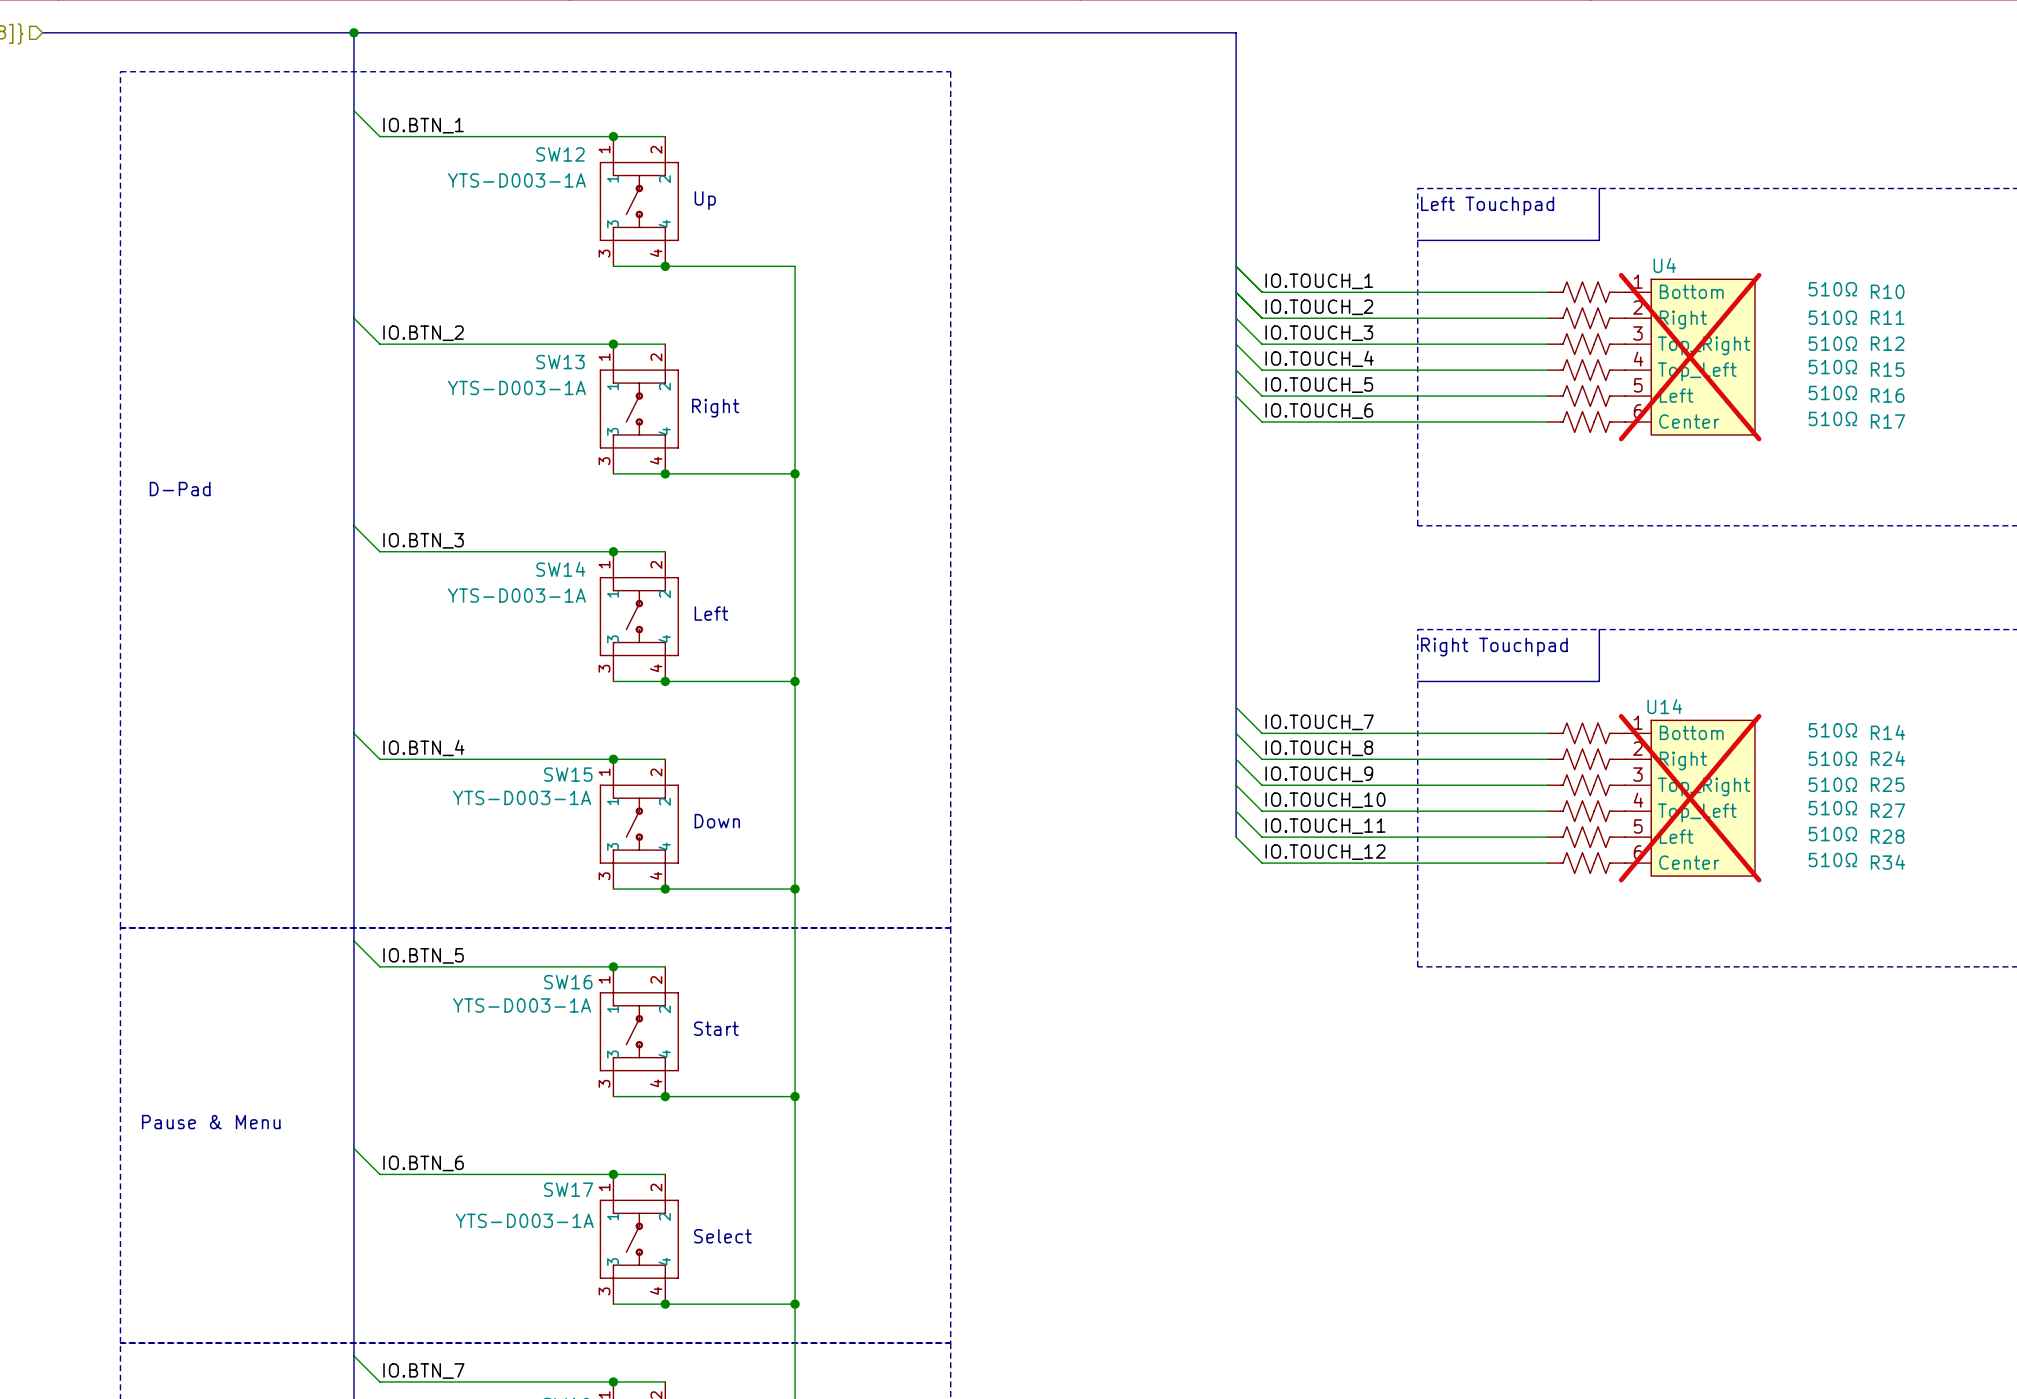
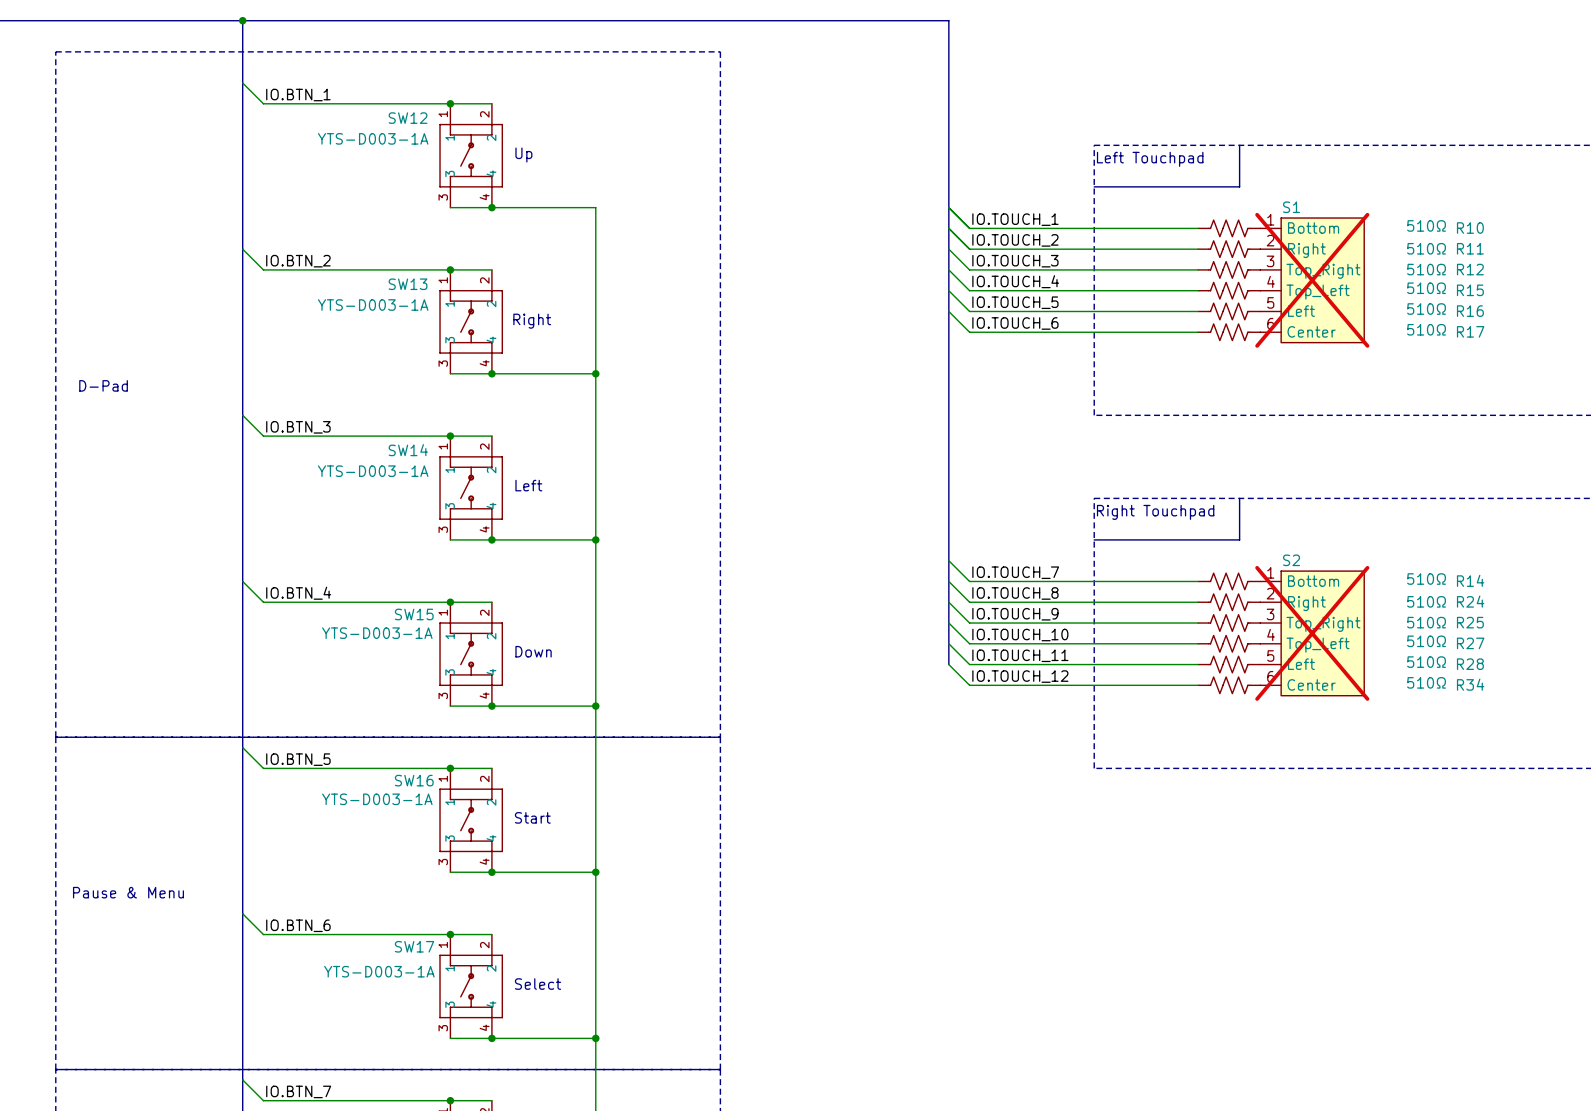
U4 name: U4 (1664, 265) -> S1 (1291, 207)
U14 name: U14 (1664, 706) -> S2 (1291, 560)

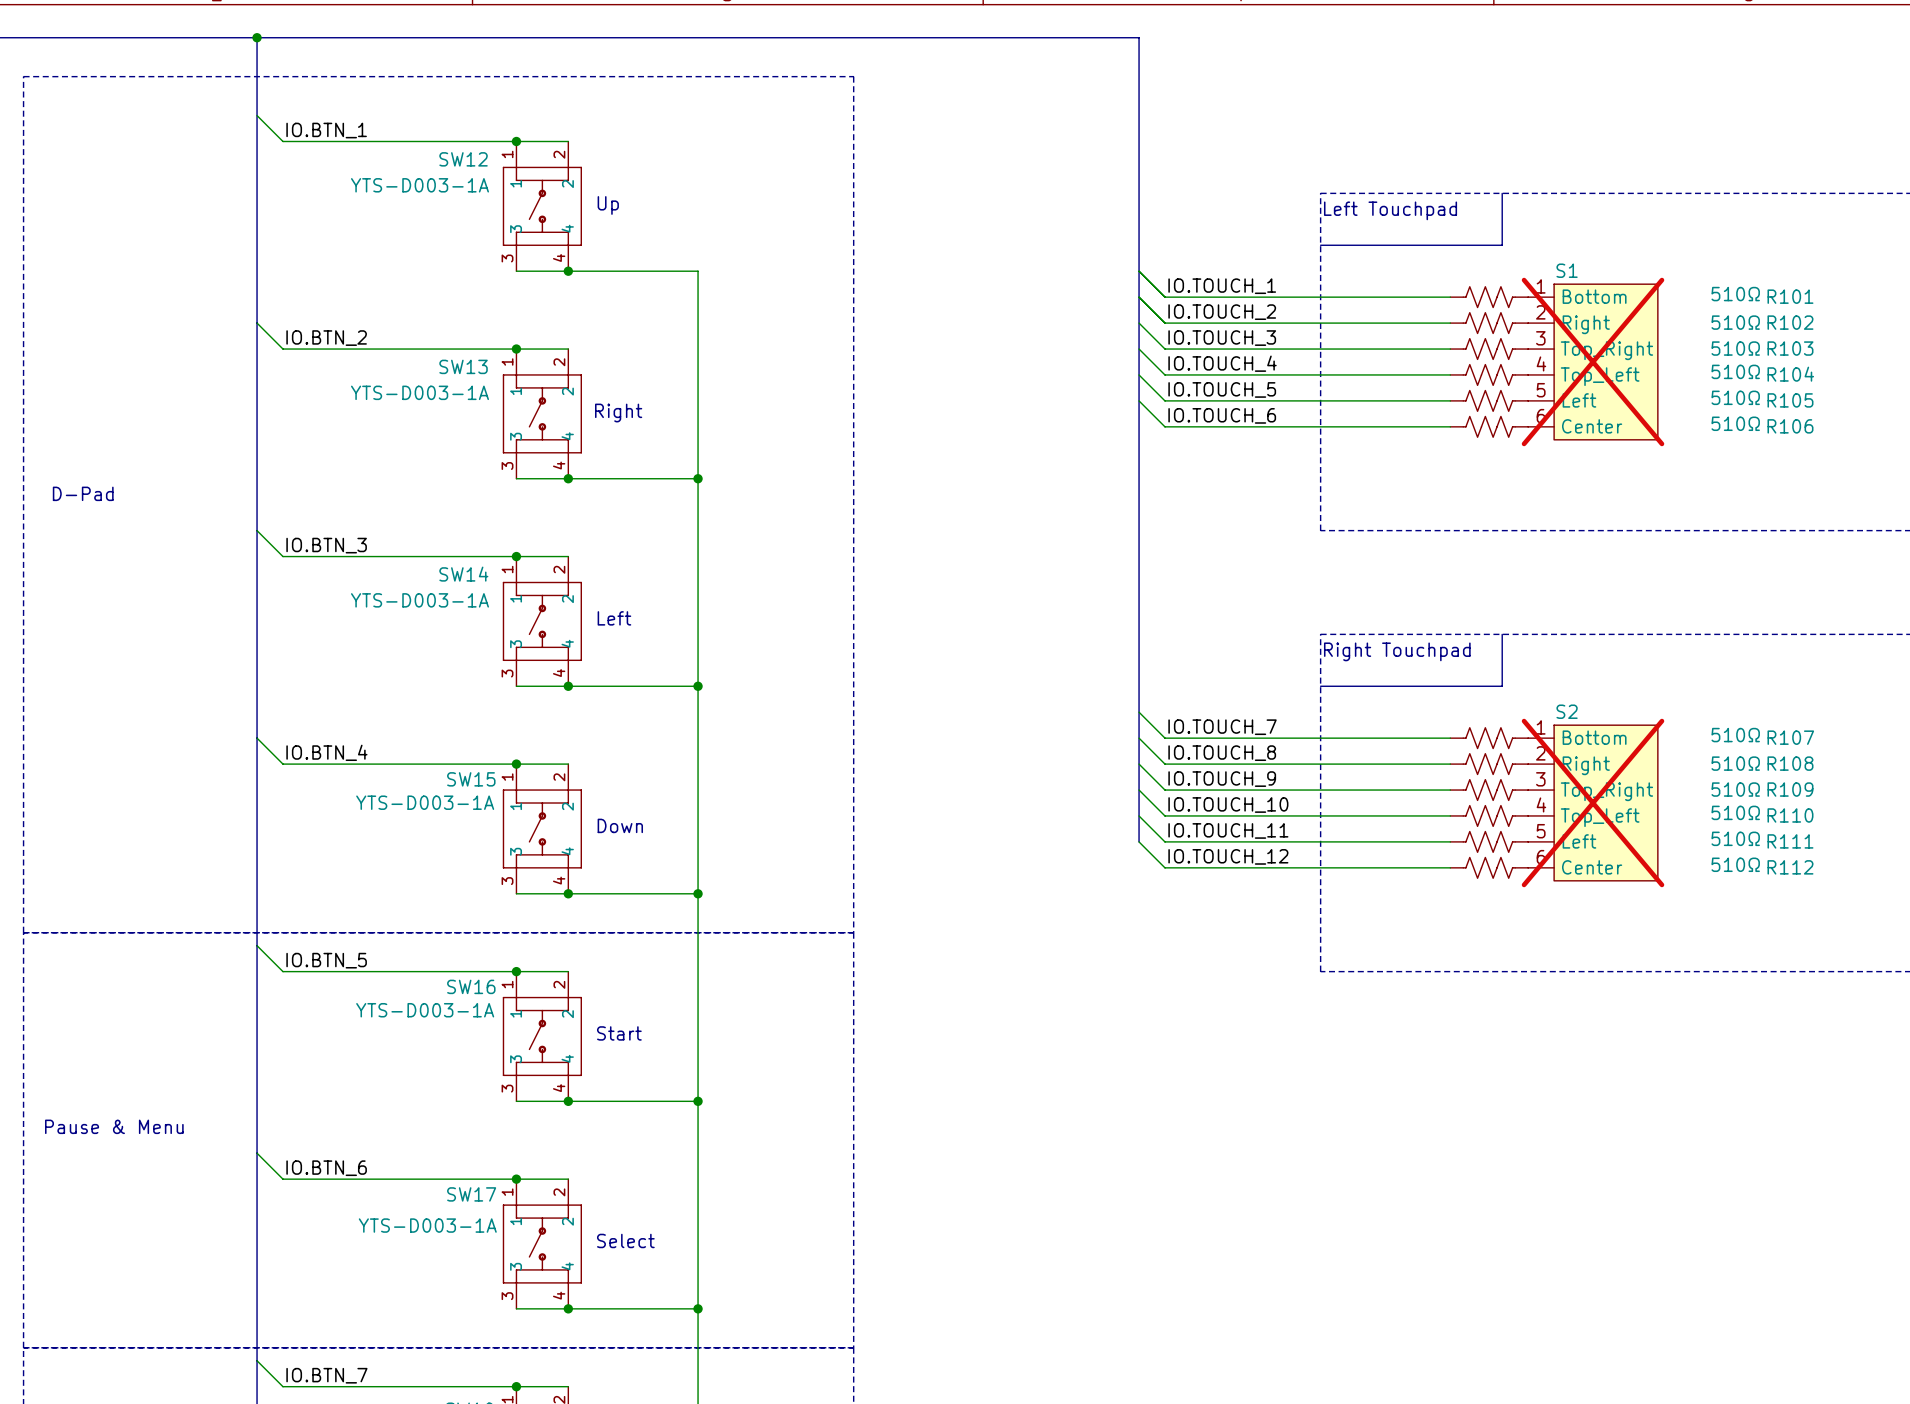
R10 name: R10 (1470, 228) -> R101 (1790, 296)
R11 name: R11 (1470, 248) -> R102 (1790, 322)
R12 name: R12 (1470, 269) -> R103 (1790, 348)
R15 name: R15 (1470, 290) -> R104 (1790, 374)
R16 name: R16 (1470, 311) -> R105 (1790, 400)
R17 name: R17 (1470, 331) -> R106 (1790, 426)
R14 name: R14 (1470, 580) -> R107 (1790, 737)
R24 name: R24 (1470, 601) -> R108 (1790, 763)
R25 name: R25 (1470, 622) -> R109 (1790, 789)
R27 name: R27 (1470, 643) -> R110 (1790, 815)
R28 name: R28 (1470, 664) -> R111 (1790, 841)
R34 name: R34 (1470, 684) -> R112 (1790, 867)

